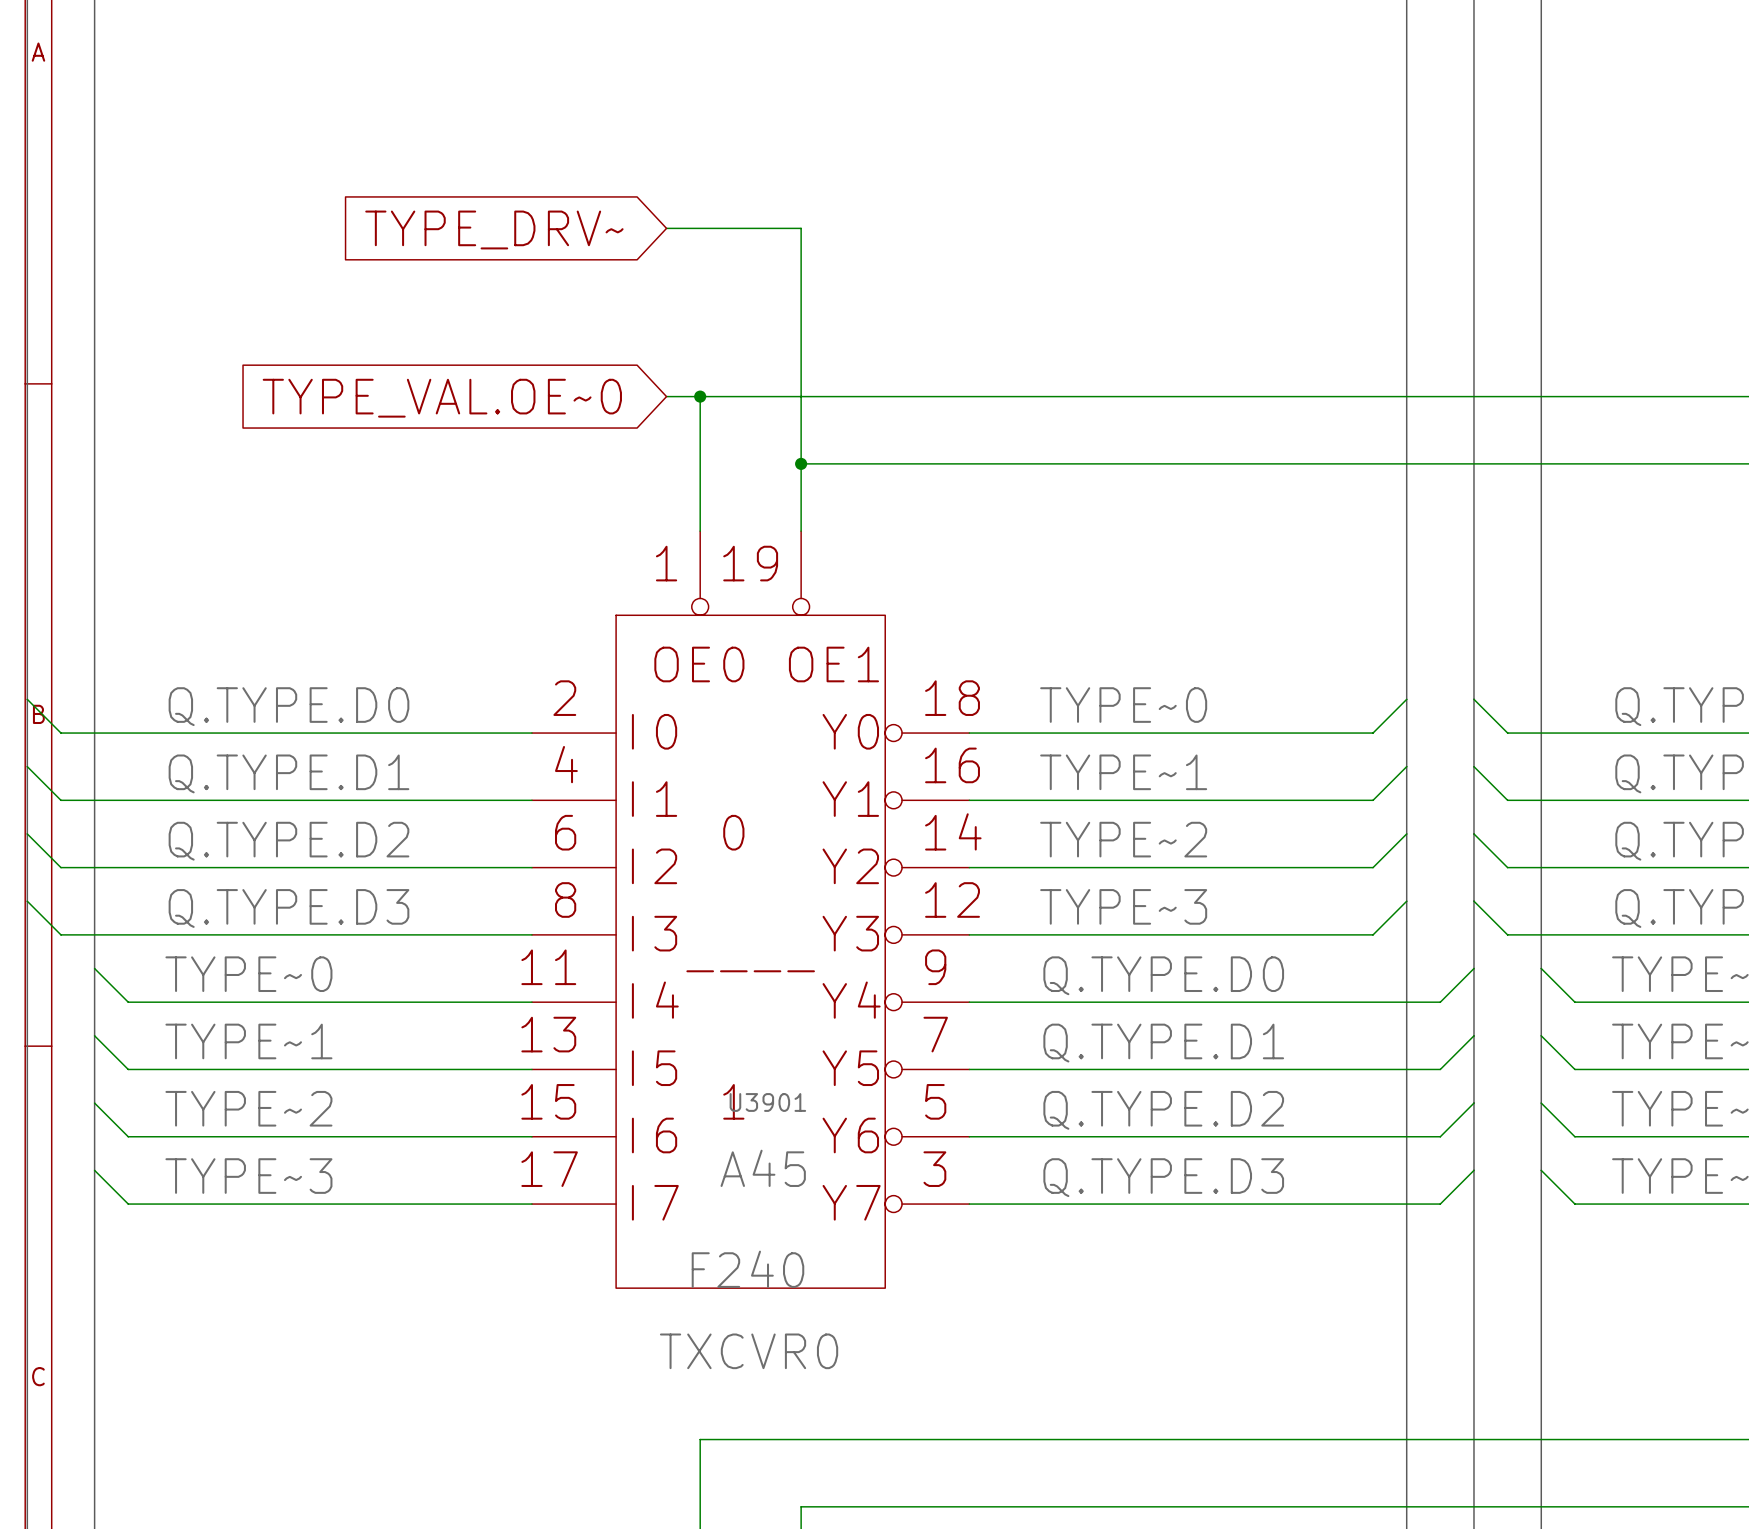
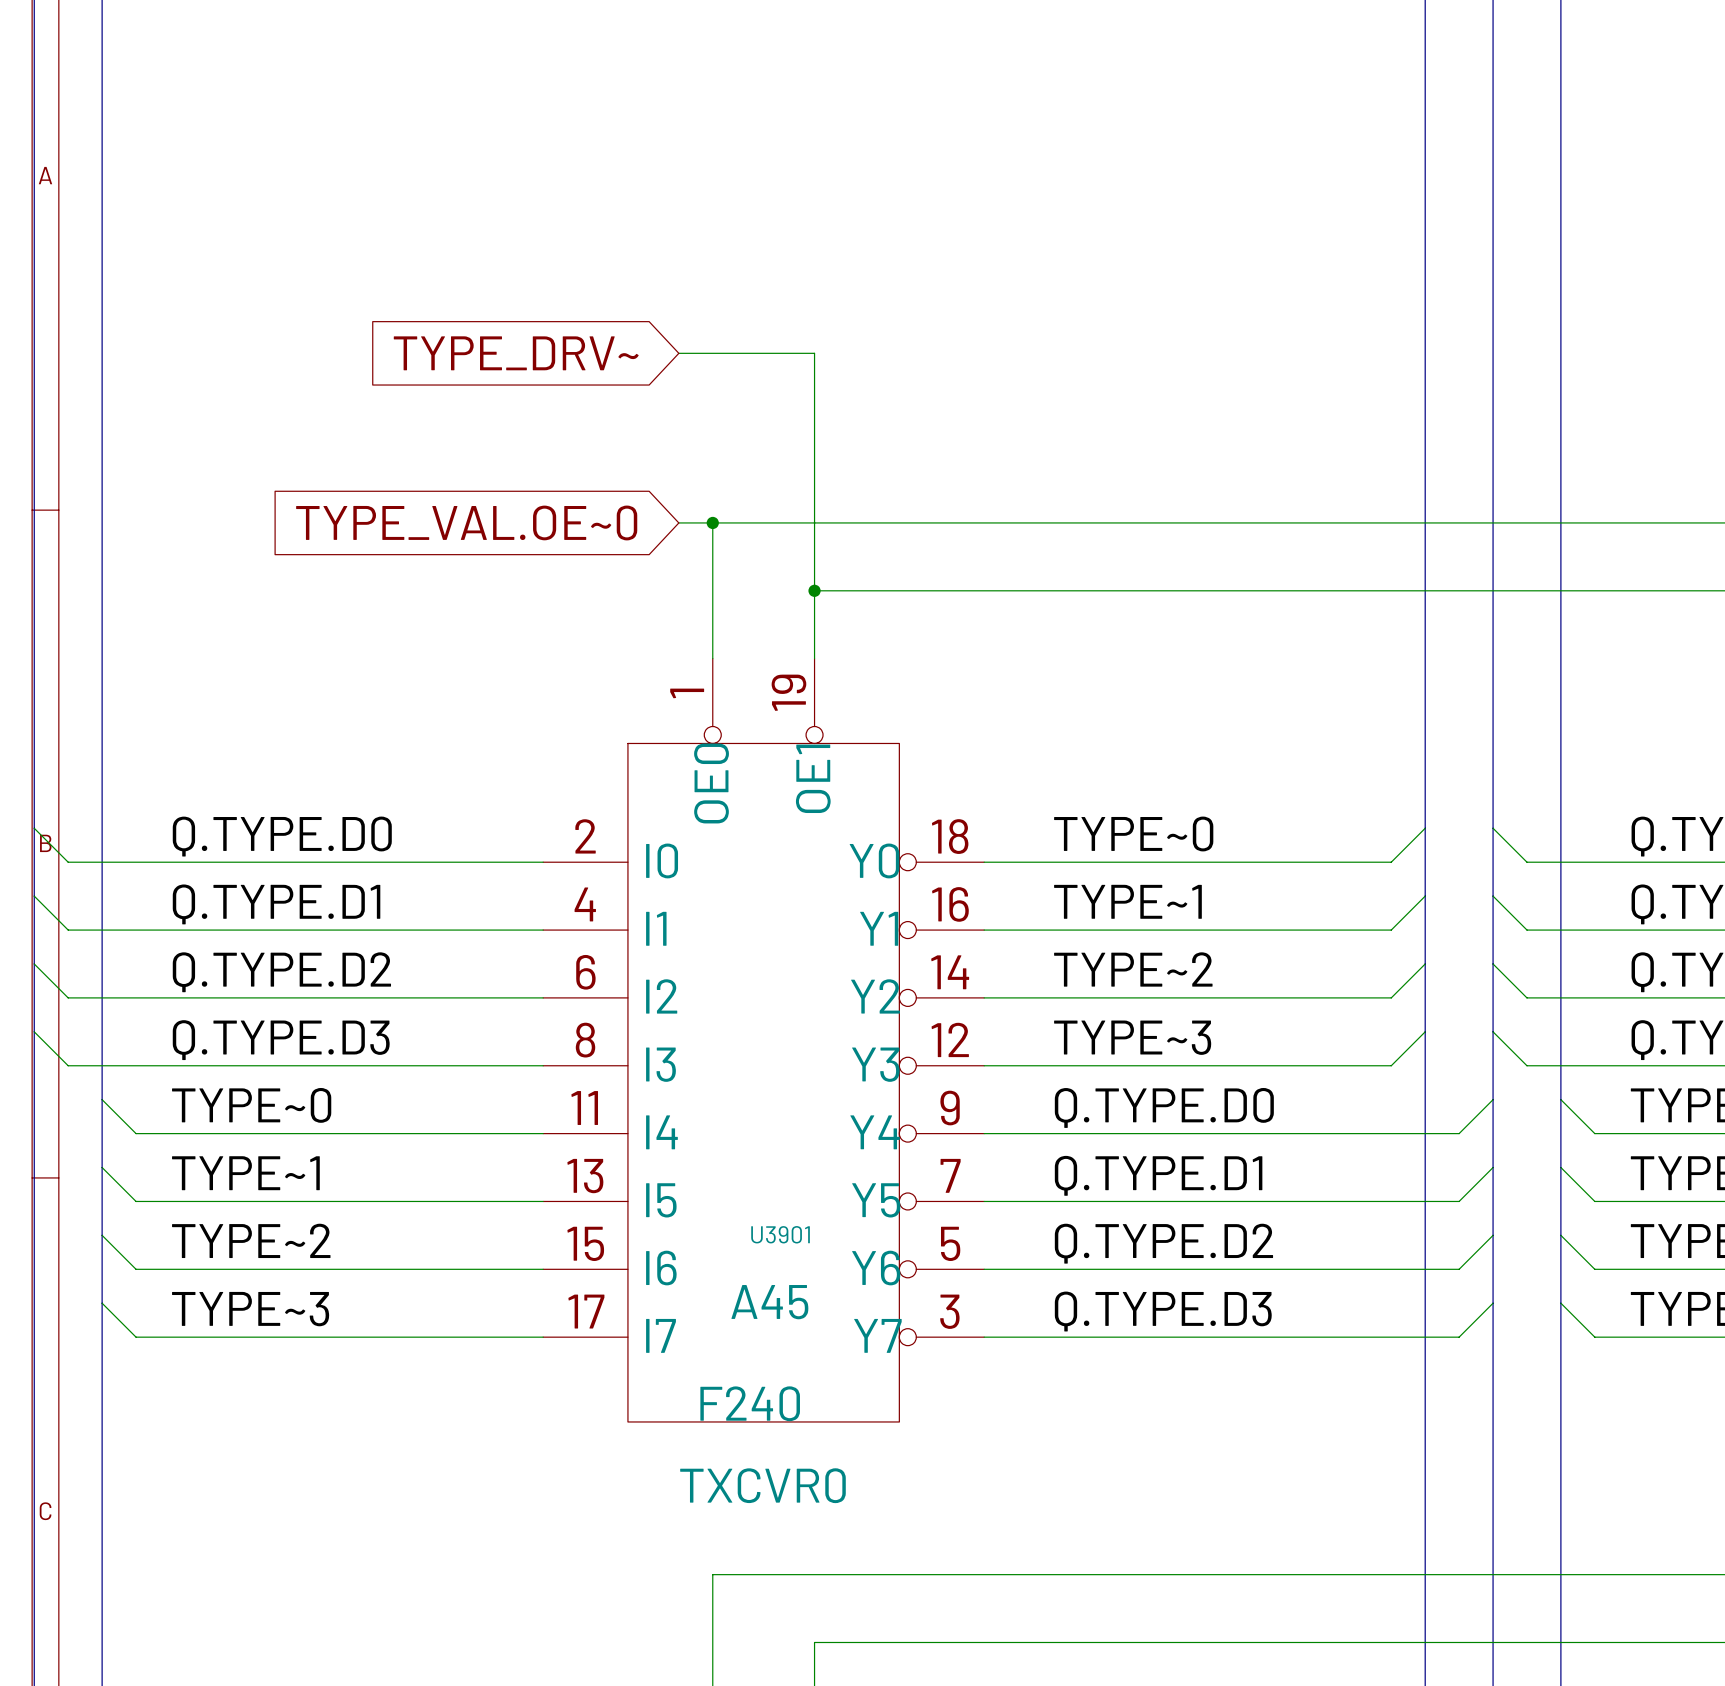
U3901 symbol: [531, 531, 970, 1289] -> [543, 658, 985, 1422]

